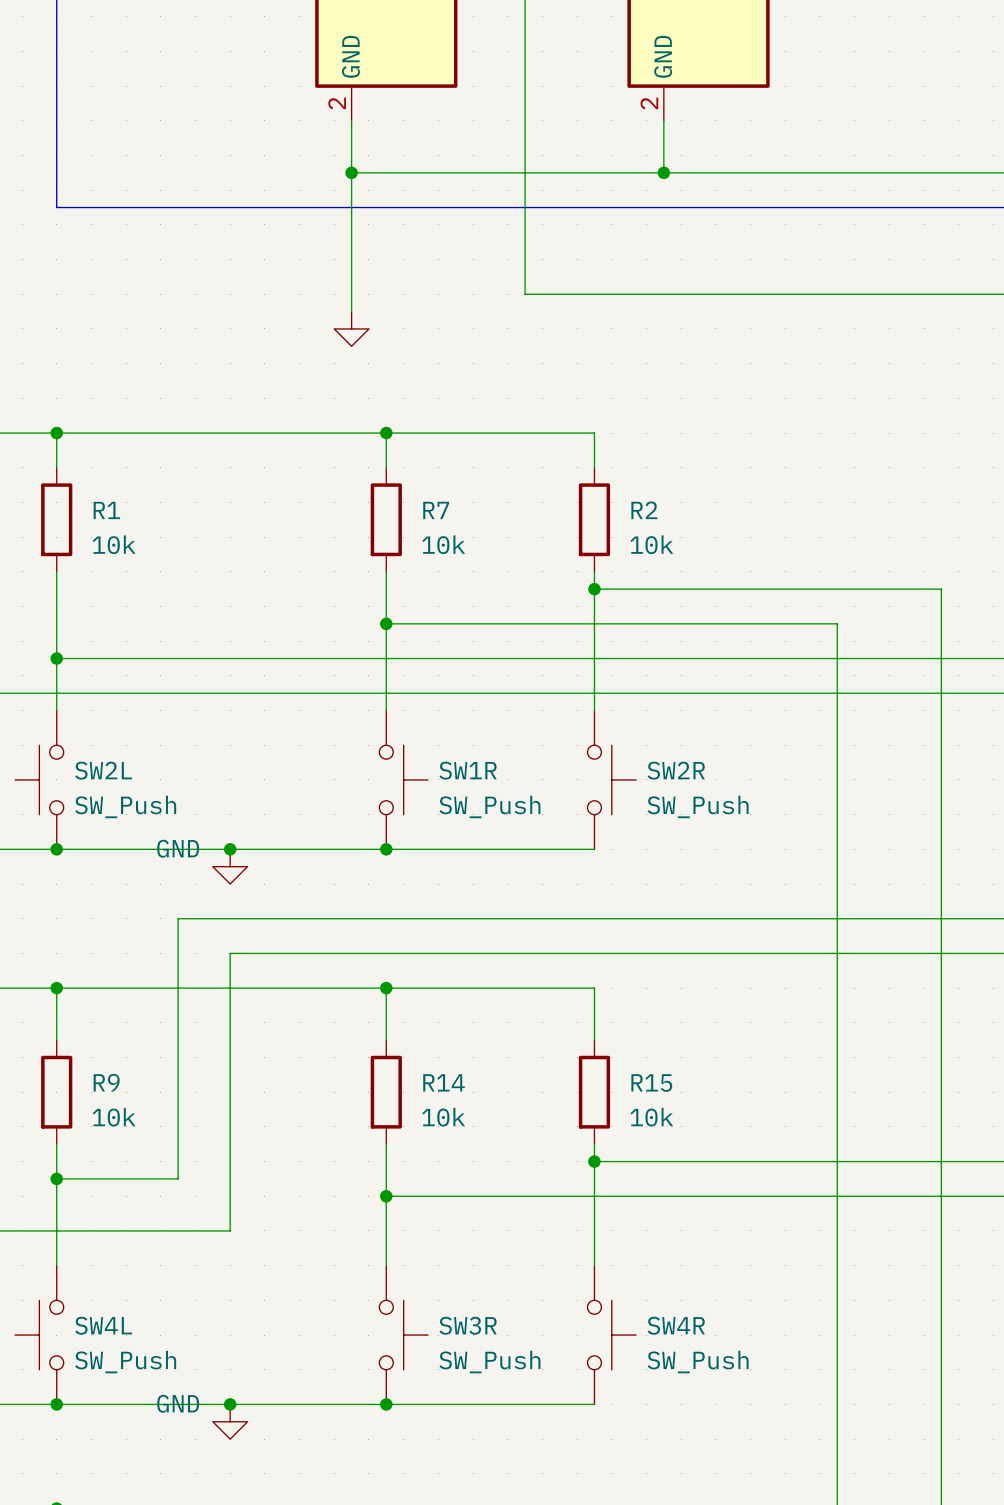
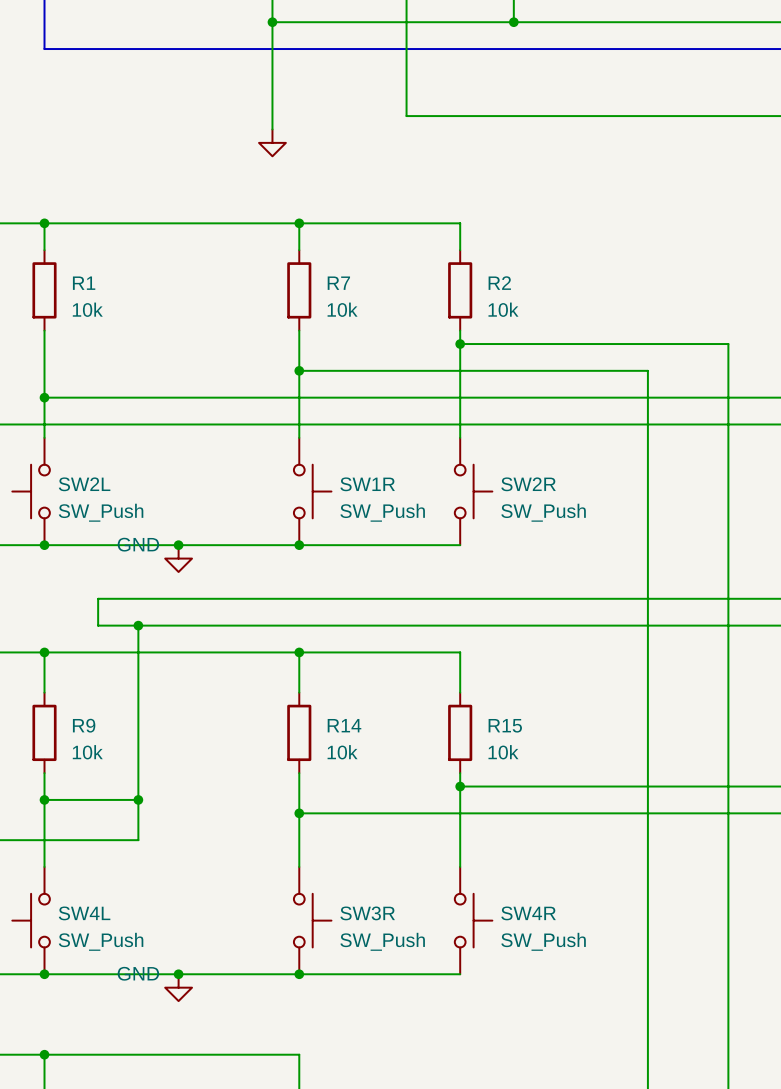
wire: (178, 918) (178, 953) -> (138, 598) (98, 598) (98, 625) (178, 625)
junction: none -> (138, 625)
wire: (230, 953) (230, 1230) (178, 1230) -> (138, 799) (138, 840)
junction: none -> (138, 799)

